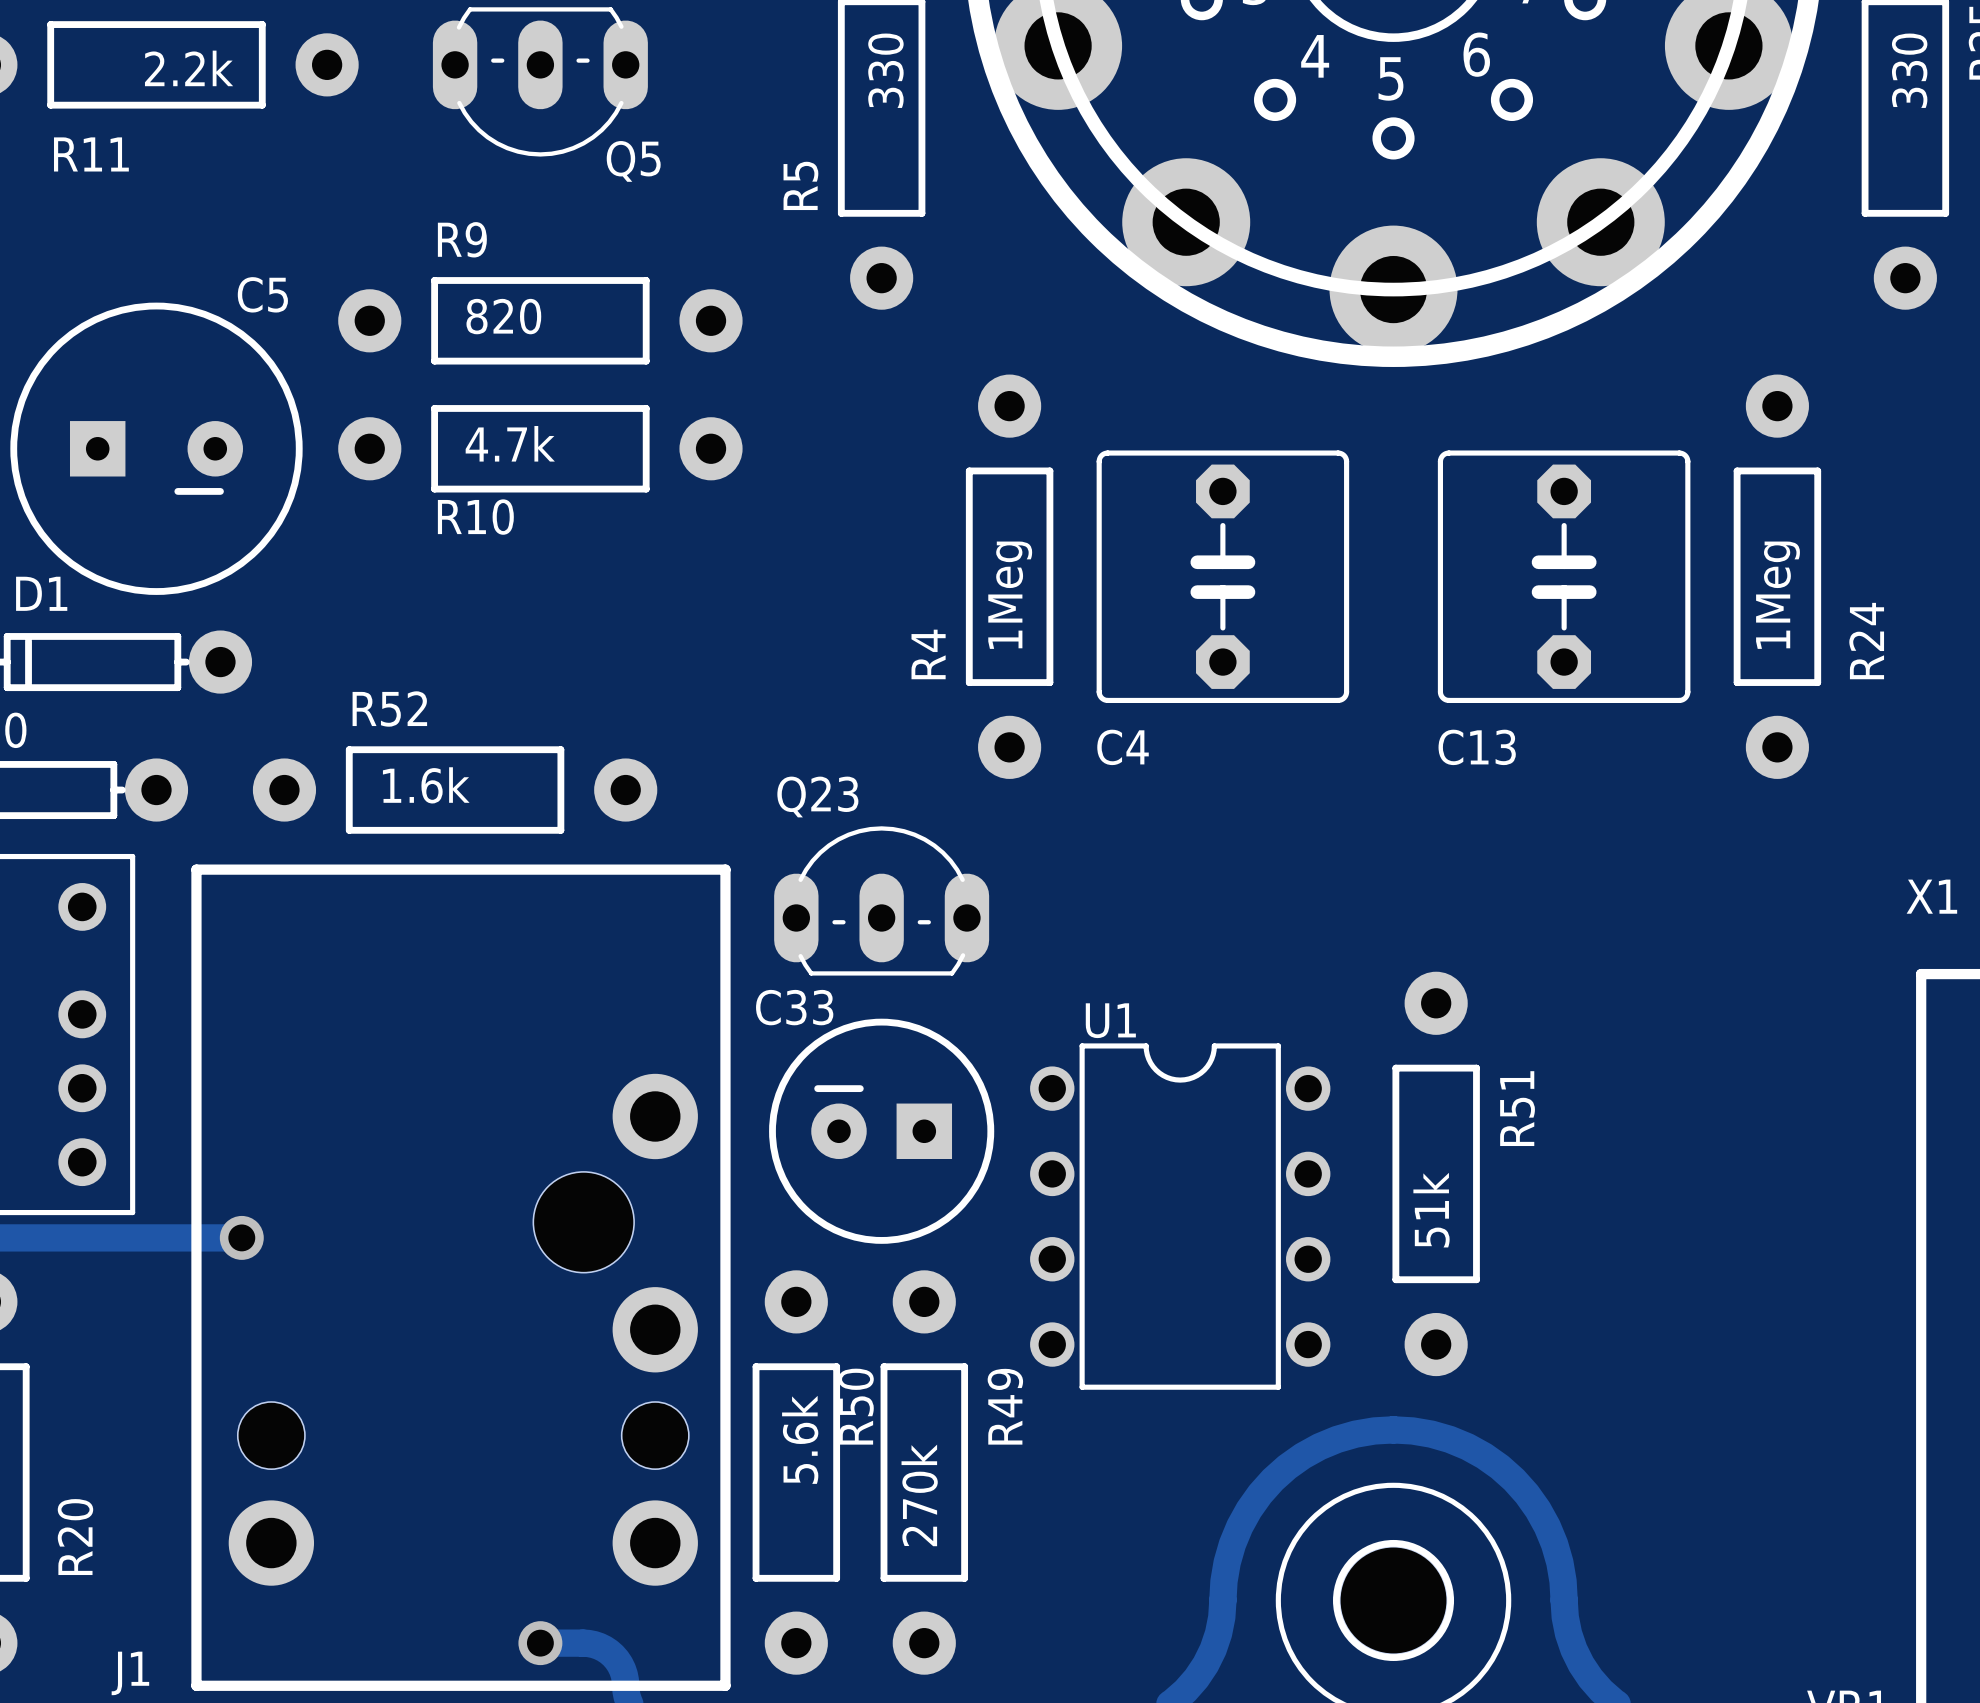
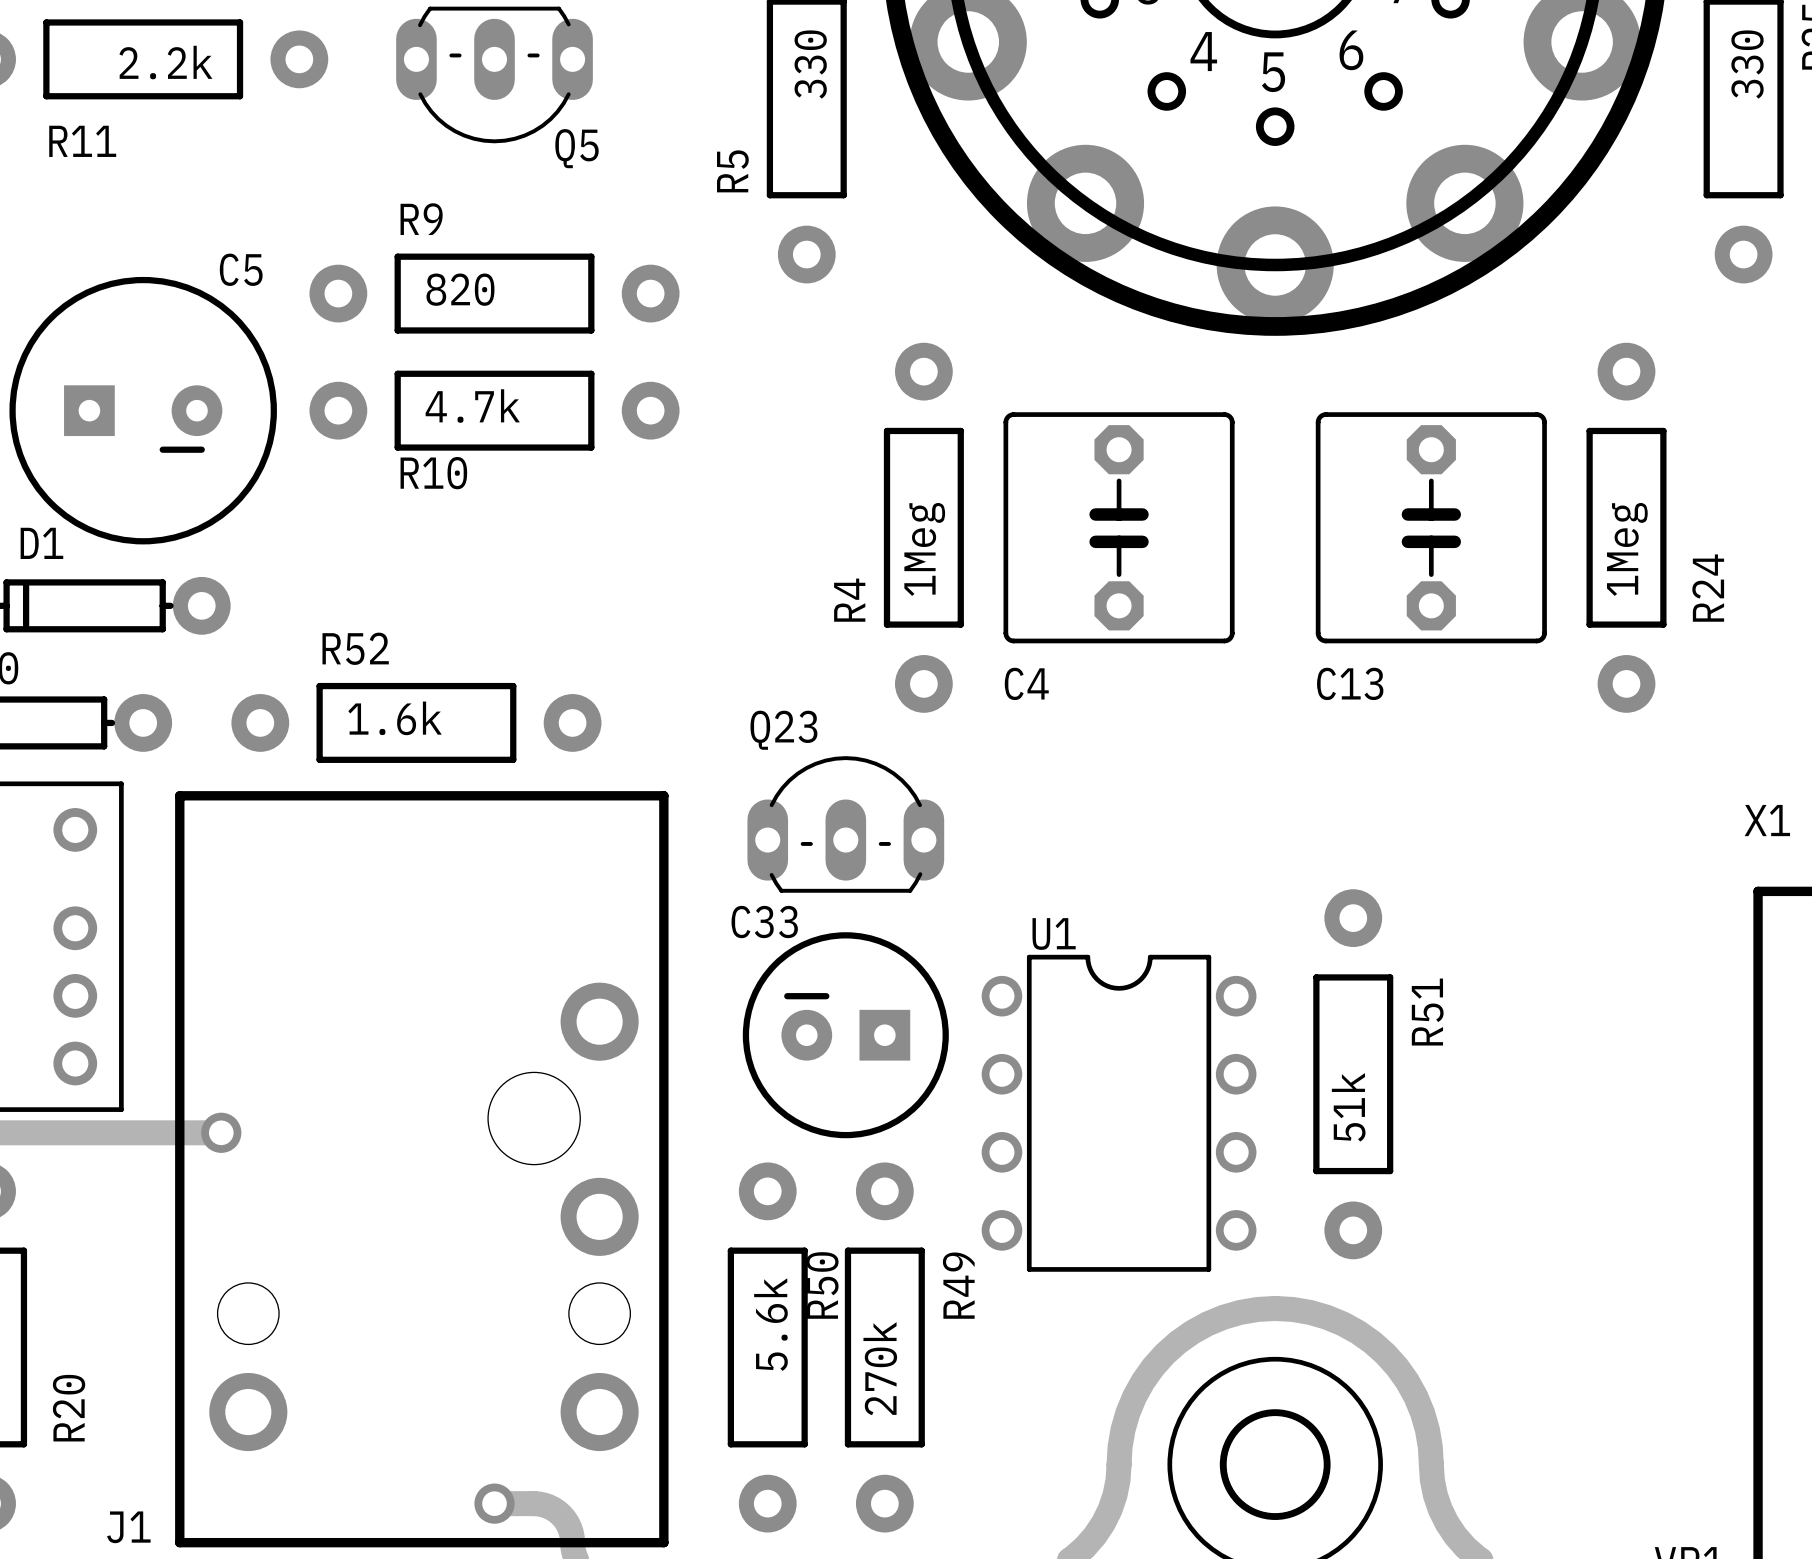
Q23 position: (881, 900) -> (845, 824)
C33 position: (881, 1131) -> (845, 1035)
R51 position: (1436, 1173) -> (1353, 1074)
U1 position: (1180, 1216) -> (1119, 1113)
R50 position: (796, 1472) -> (767, 1347)
R49 position: (924, 1472) -> (884, 1347)

